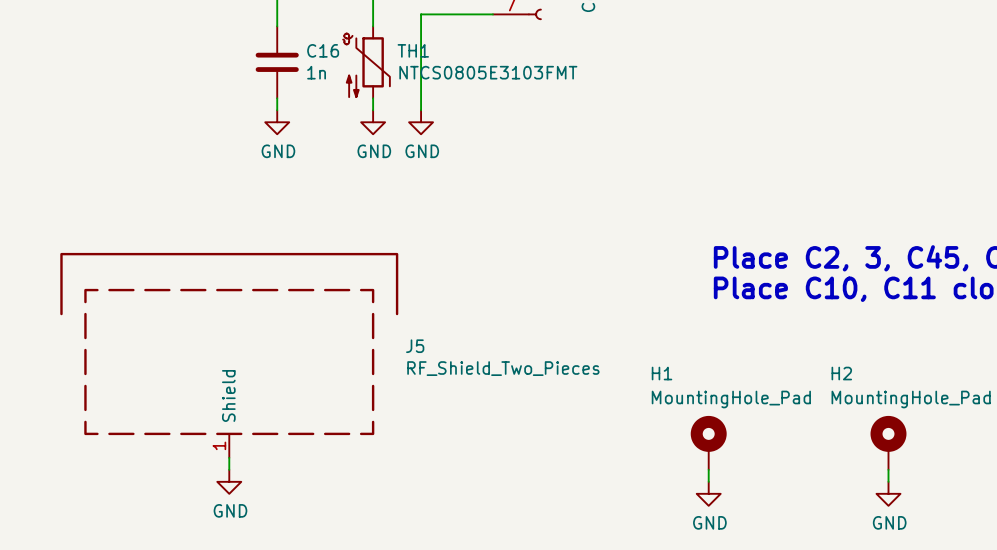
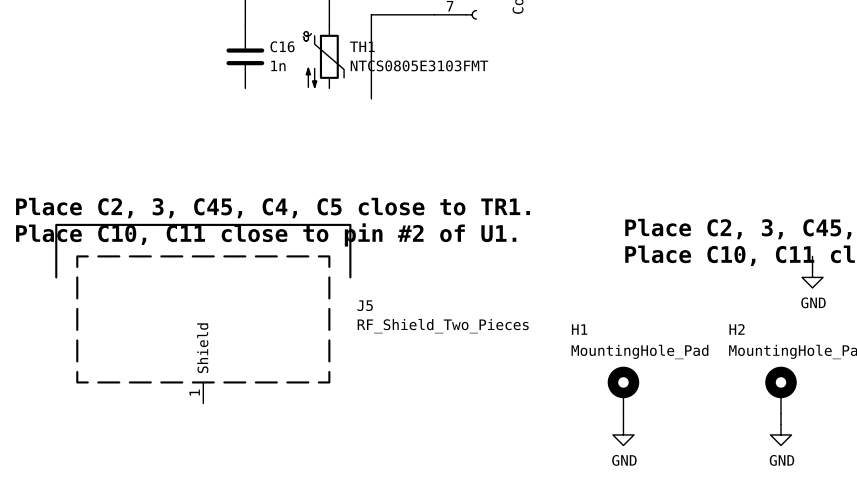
wire: (277, 98) (277, 110) -> none
wire: (373, 98) (373, 110) -> none
power symbol: GND (277, 122) -> none
power symbol: GND (373, 122) -> none
power symbol: GND (421, 122) -> none
text: none -> Place C2, 3, C45, C4, C5 close to TR1. (273, 208)
text: none -> Place C10, C11 close to pin #2 of U1. (266, 234)
wire: none -> (812, 256) (812, 266)
power symbol: none -> GND (812, 277)
wire: (229, 457) (229, 469) -> none
power symbol: GND (229, 481) -> none

